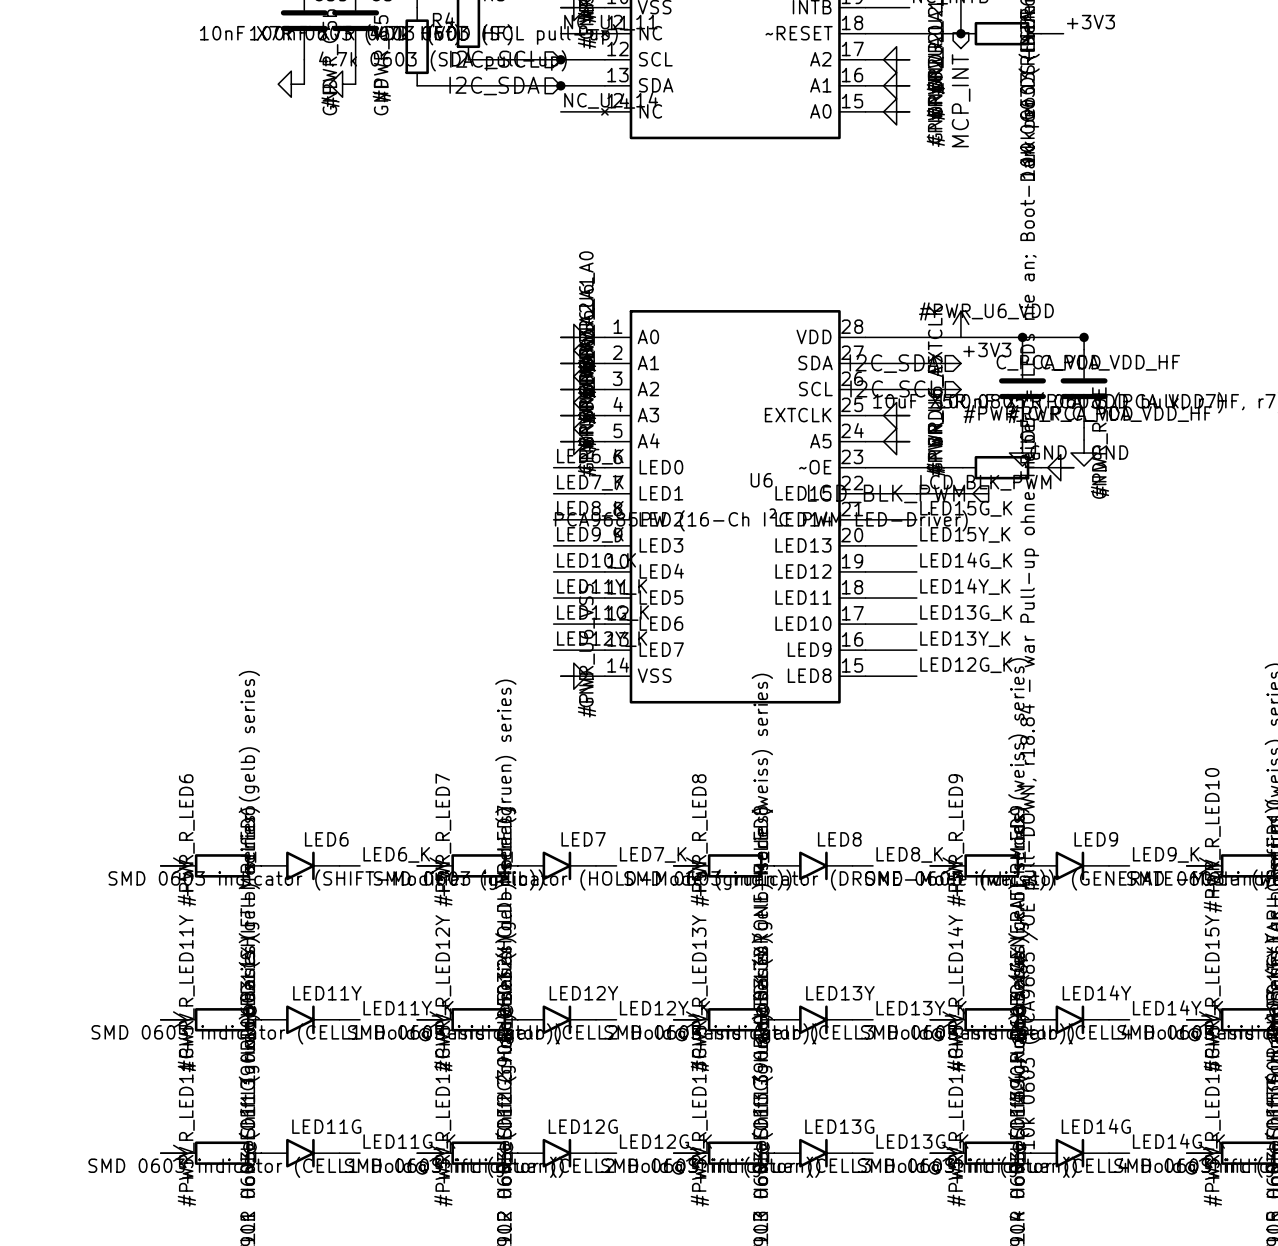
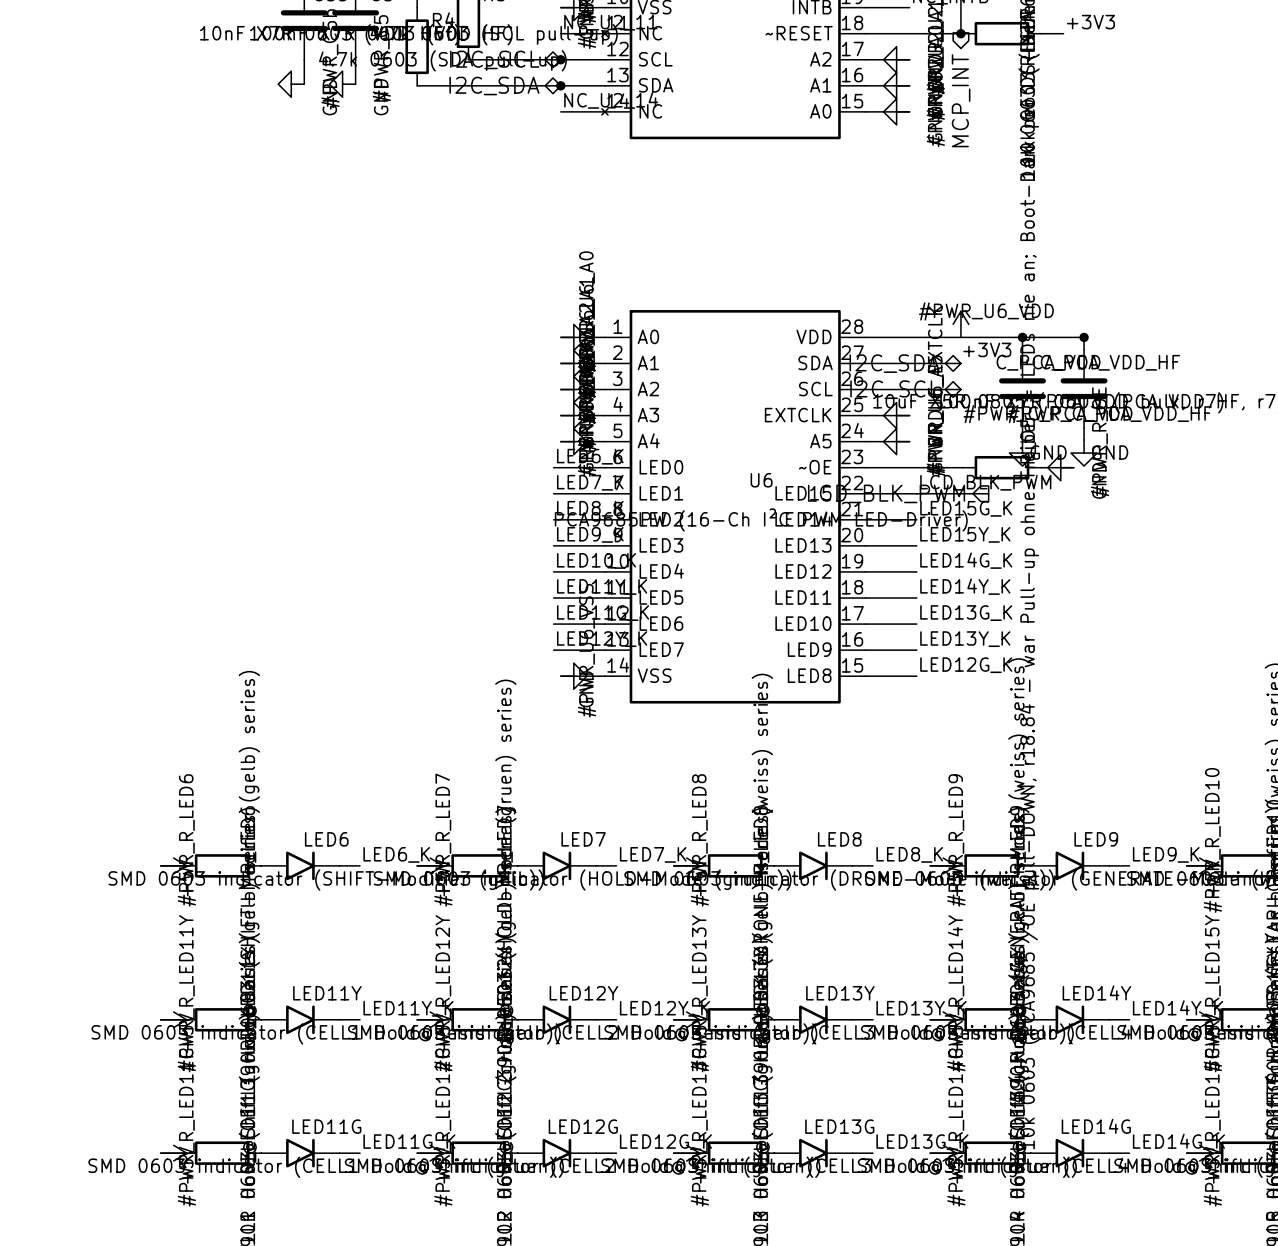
hierarchical label shape: input (494, 59) -> bidirectional (494, 59)
hierarchical label shape: input (494, 85) -> bidirectional (494, 85)
hierarchical label shape: input (894, 363) -> bidirectional (894, 363)
hierarchical label shape: input (894, 389) -> bidirectional (894, 389)

